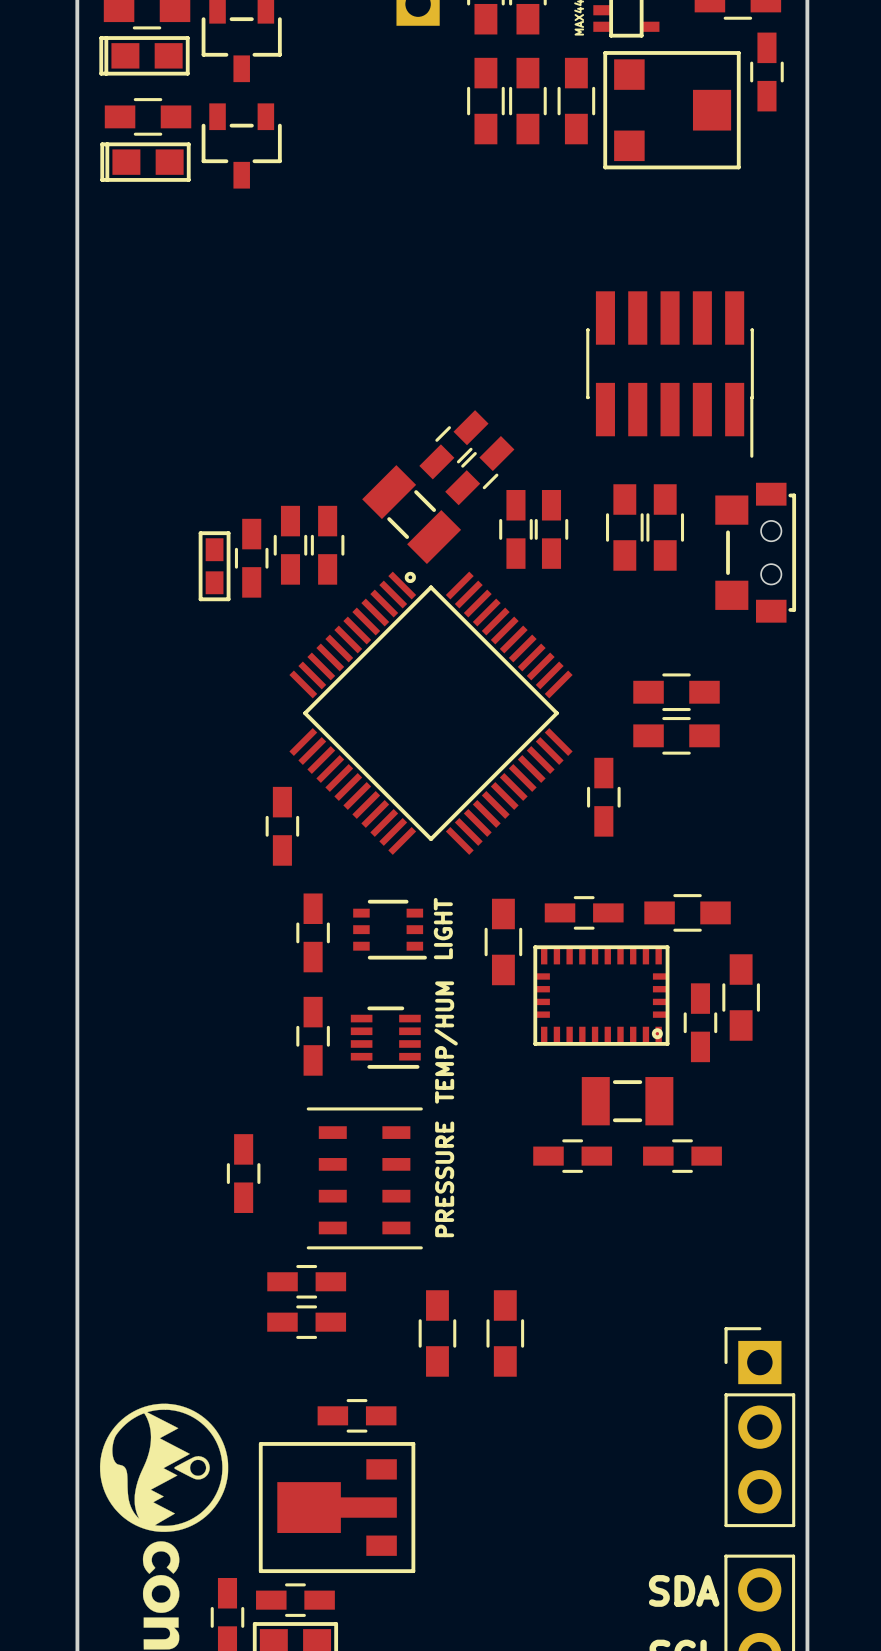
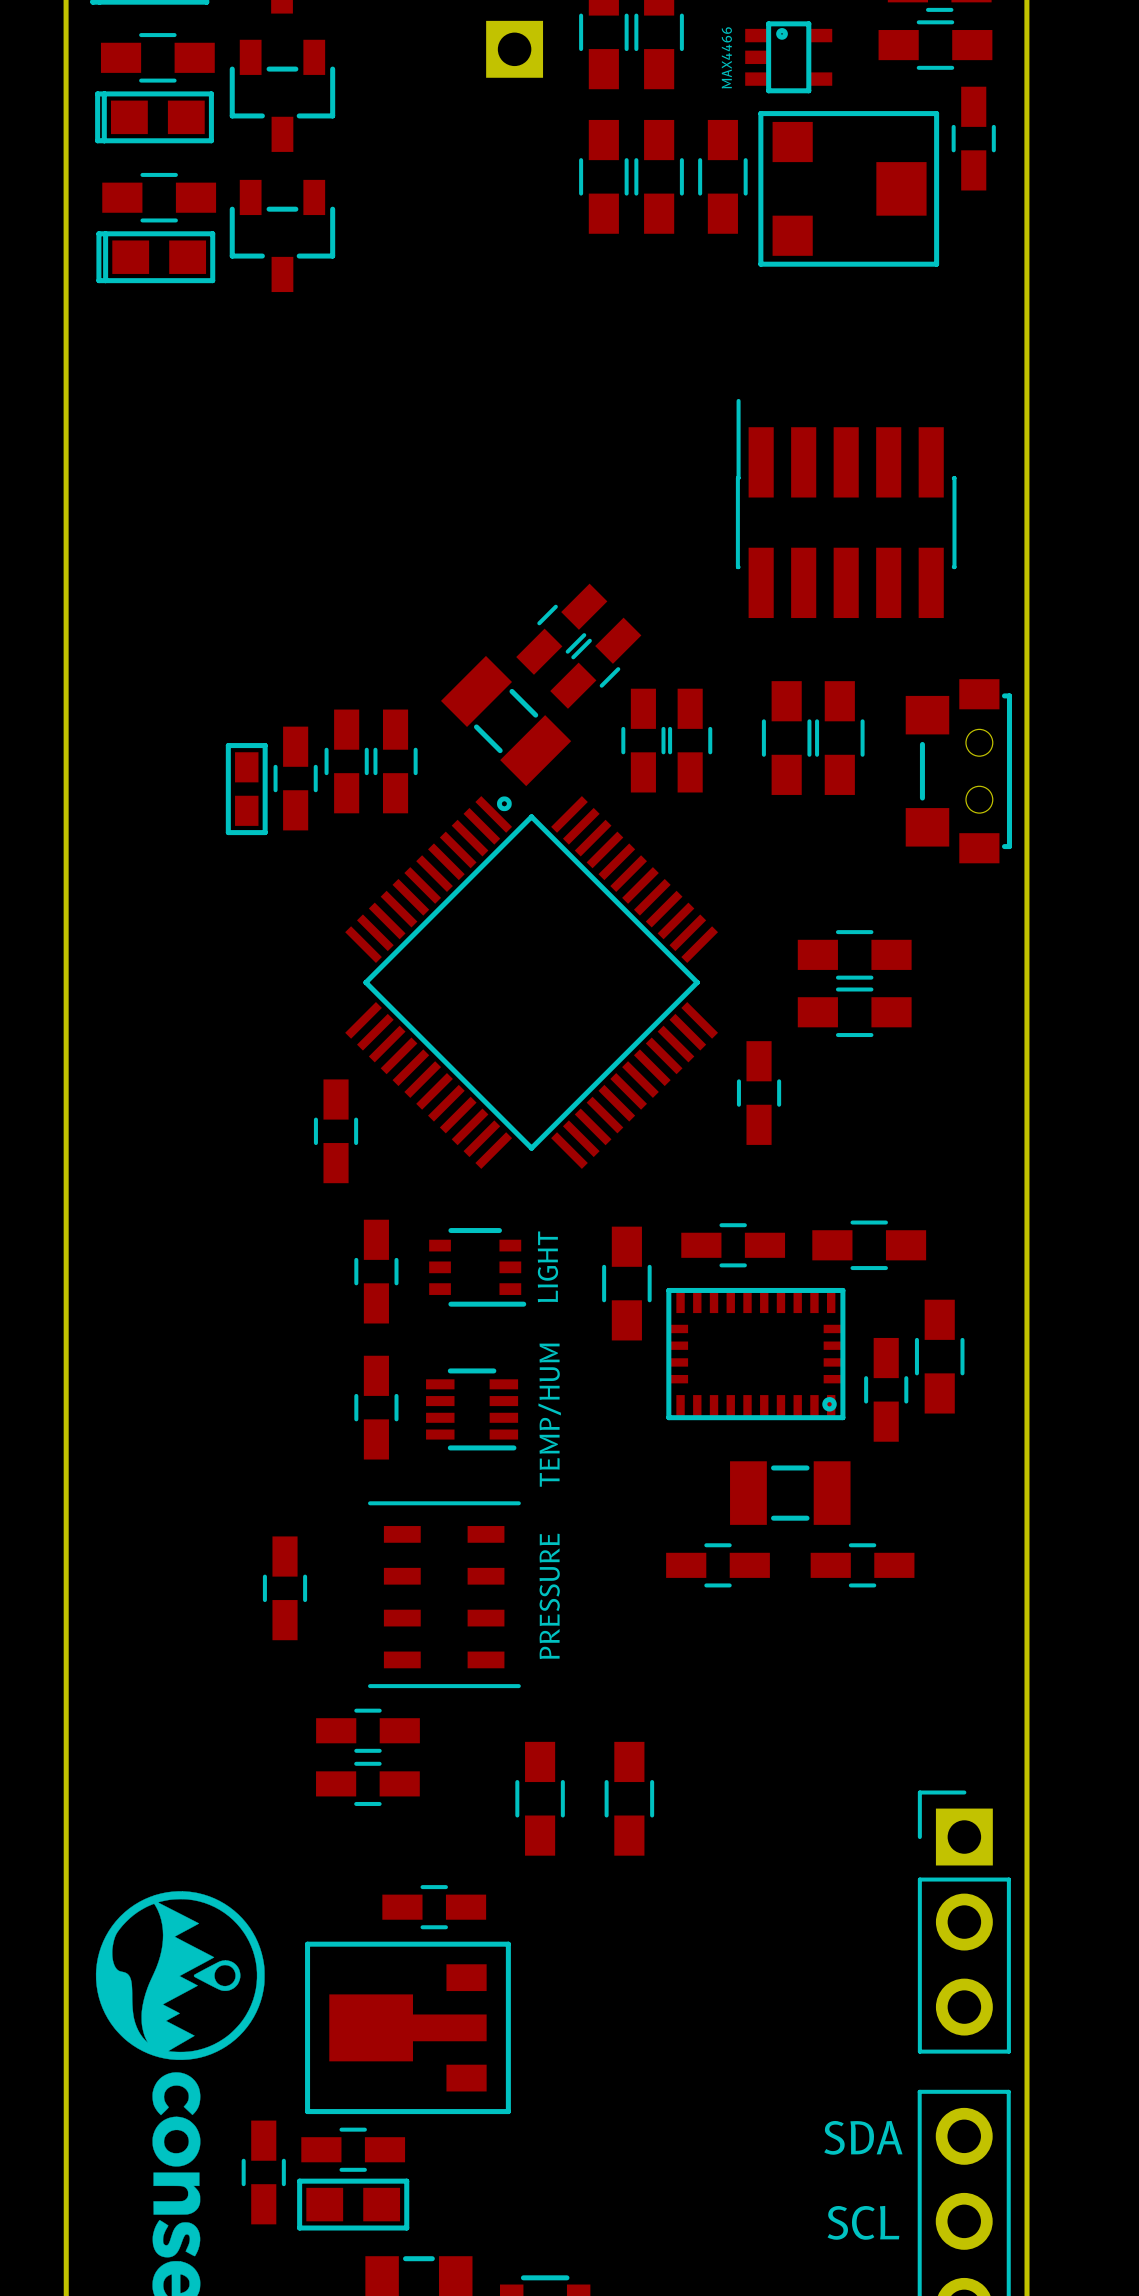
part rotation: 0° (670, 374) -> 180° (846, 508)

